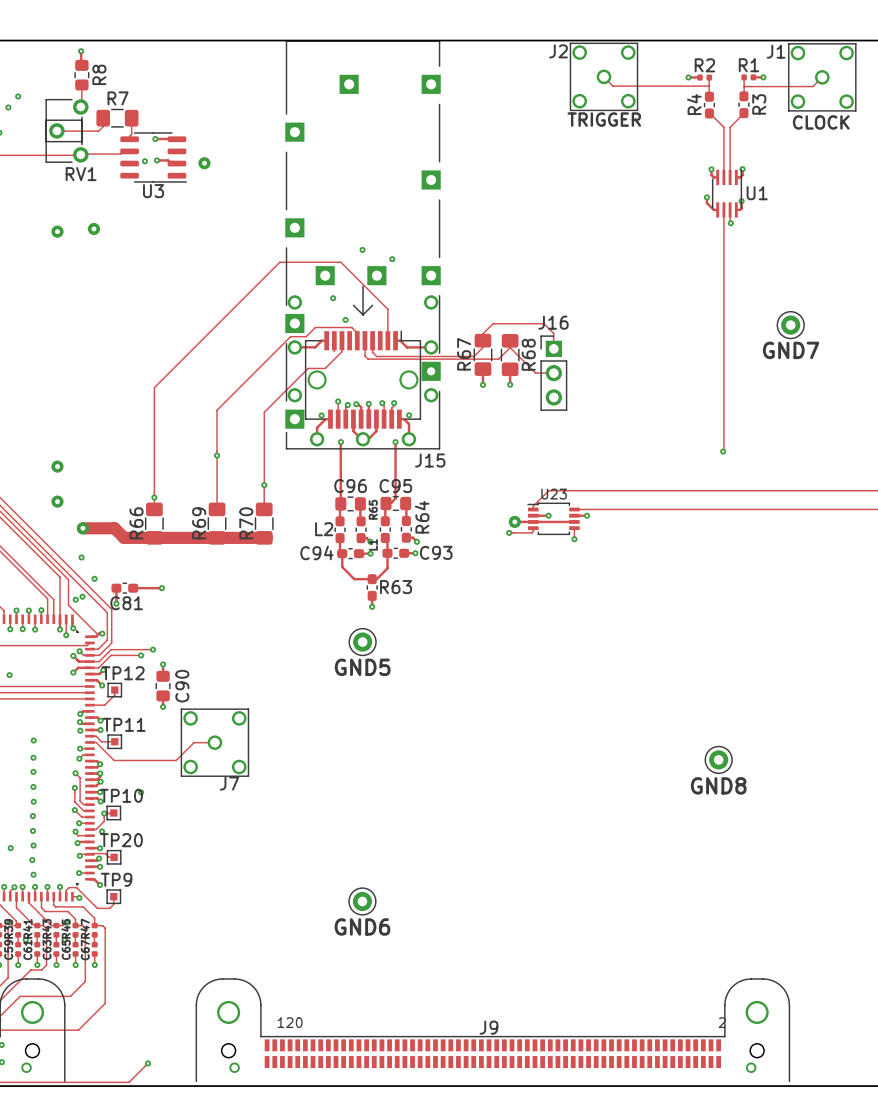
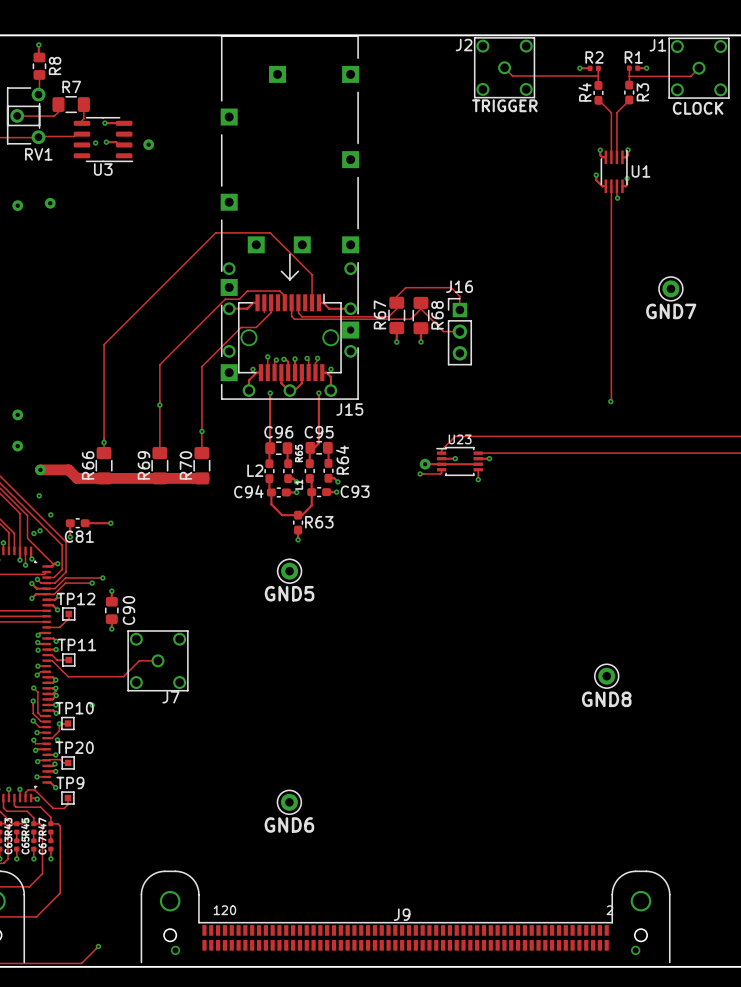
via: (362, 249) -> none
via: (392, 259) -> none
via: (333, 298) -> none
via: (345, 319) -> none

